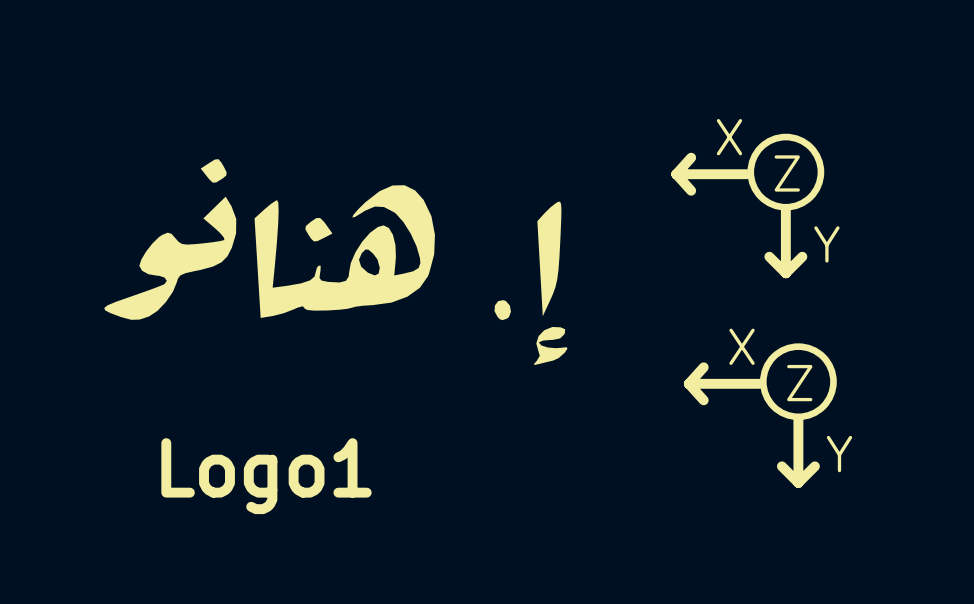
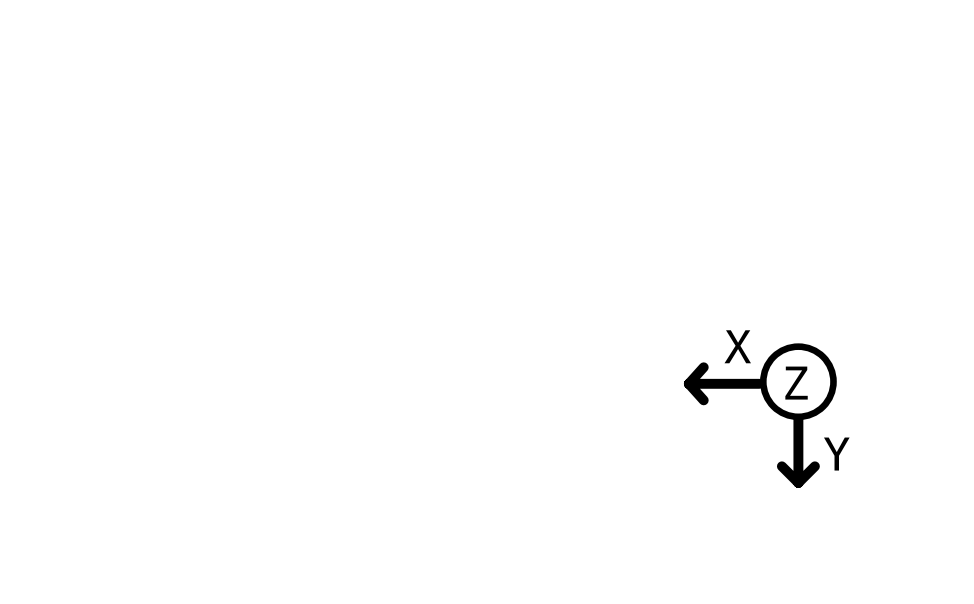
drawing: [747, 133, 825, 211] -> none
text: X (729, 137) -> none
line: (691, 157) (676, 174) -> none
text: Z (787, 173) -> none
line: (676, 174) (691, 190) -> none
line: (676, 174) (746, 174) -> none
line: (785, 209) (785, 273) -> none
text: Y (826, 244) -> none
line: (769, 256) (785, 273) -> none
line: (802, 256) (785, 273) -> none
Logo1: (335, 262) -> none

